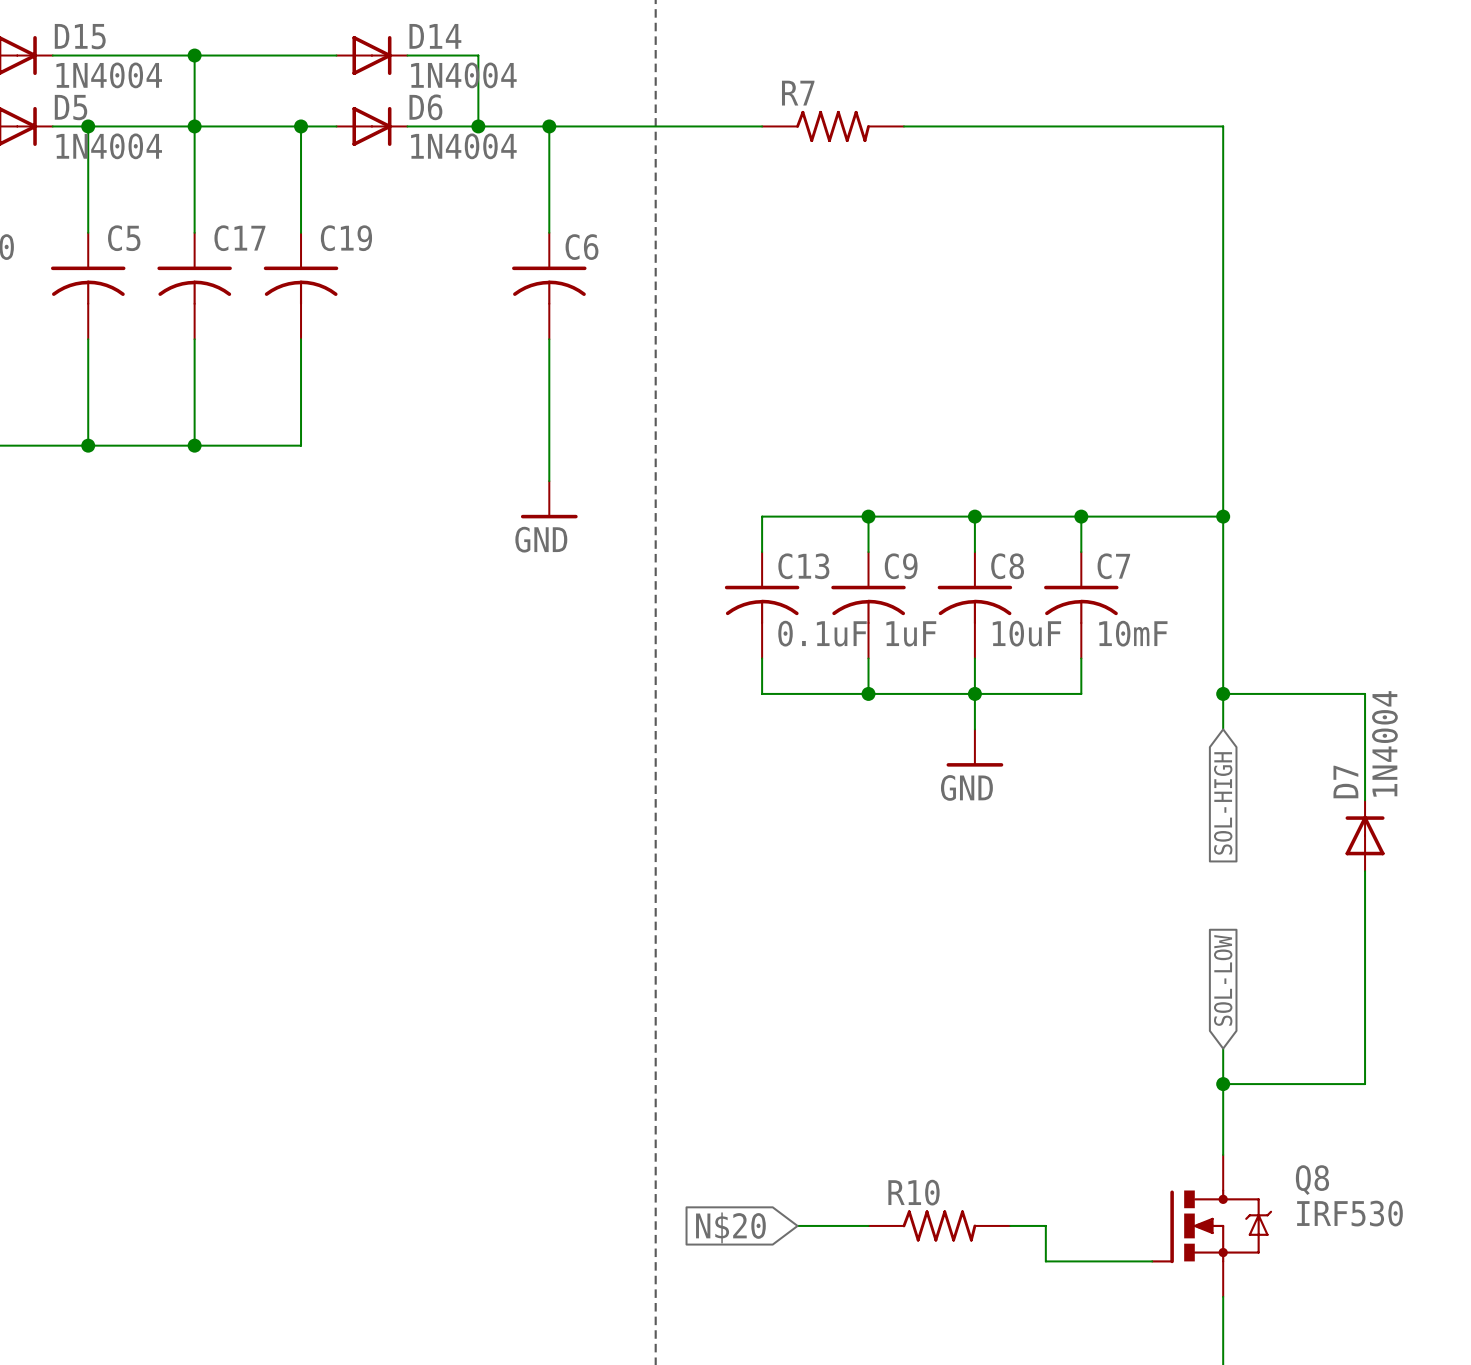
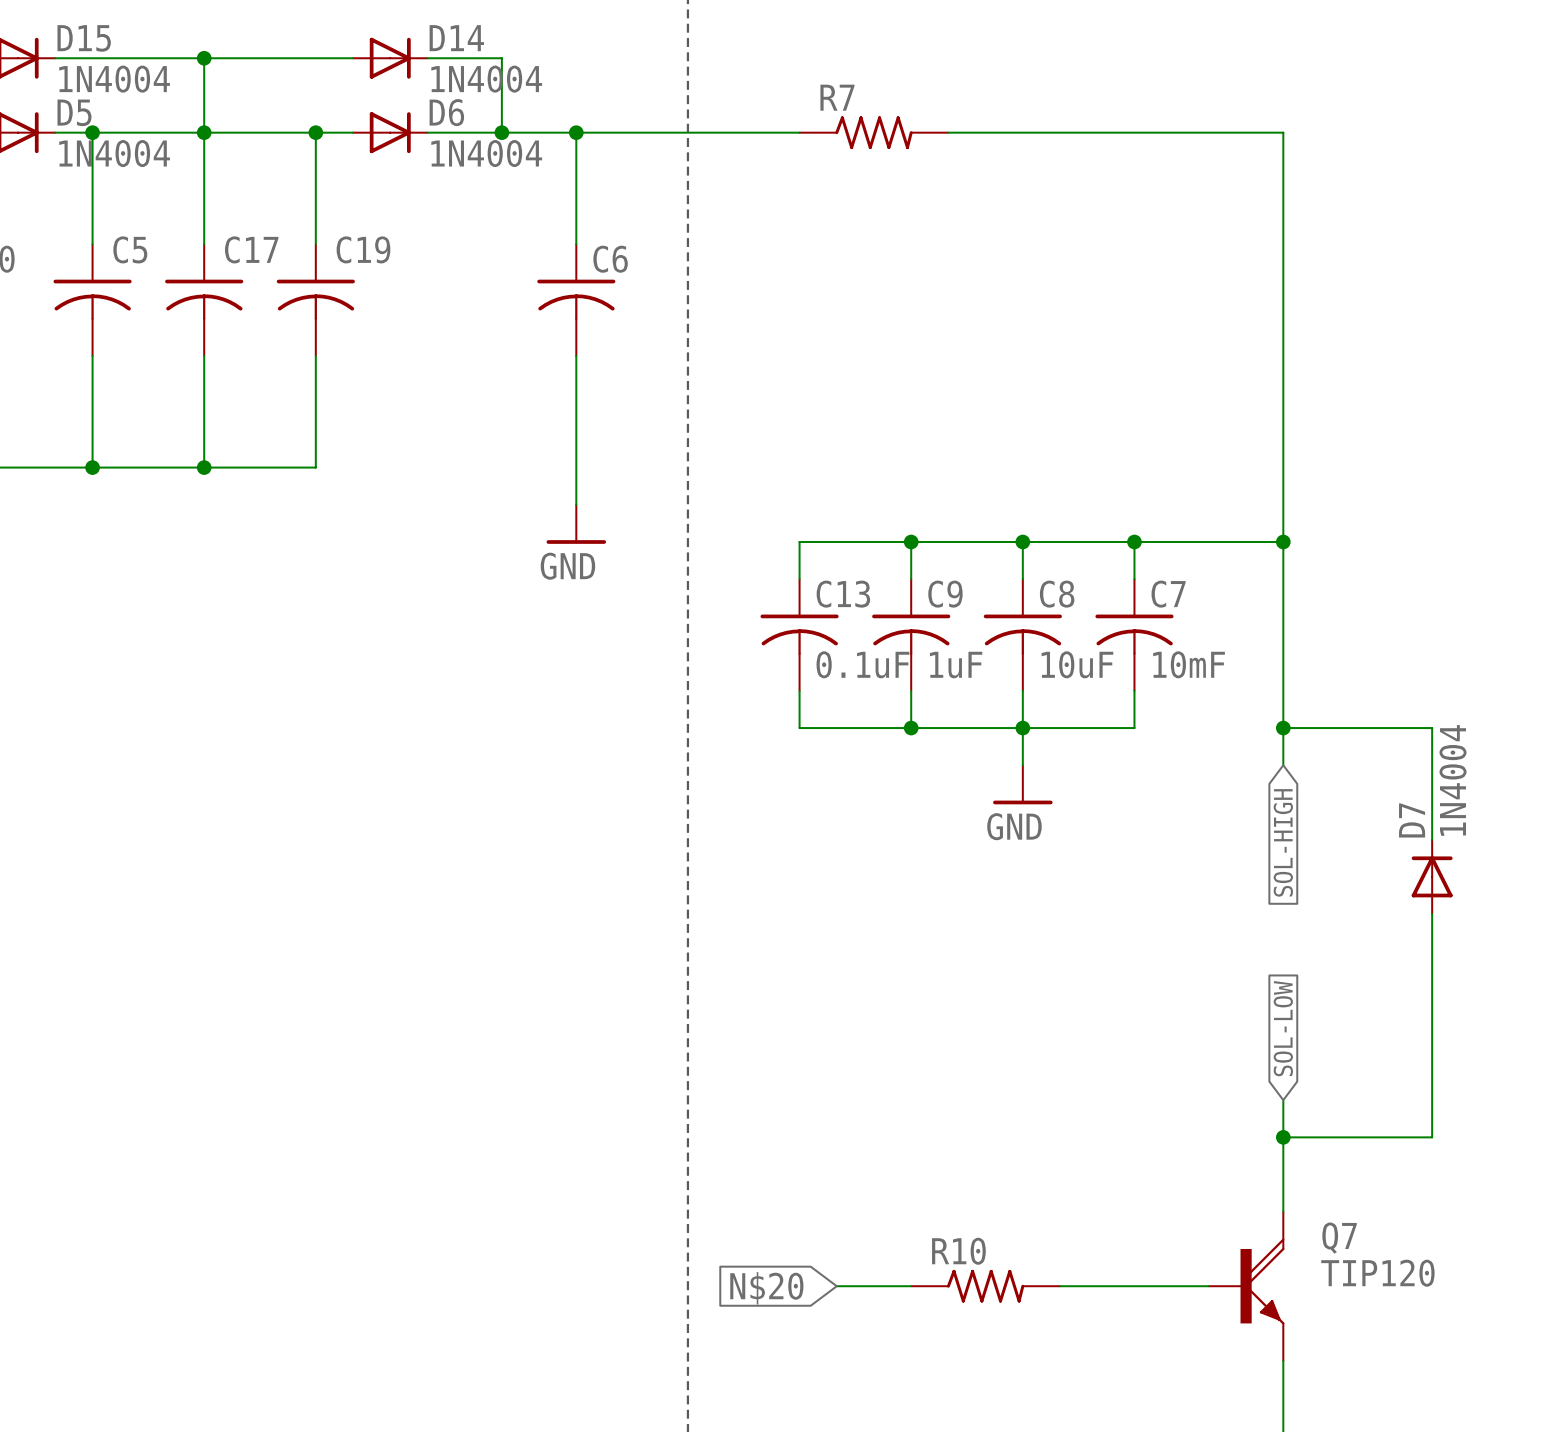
wire: (1045, 1225) (1045, 1261) (1152, 1261) -> (1097, 1286) (1208, 1286)
Q7: none -> TIP120 (1246, 1286)
Q8: IRF530 (1211, 1225) -> none

